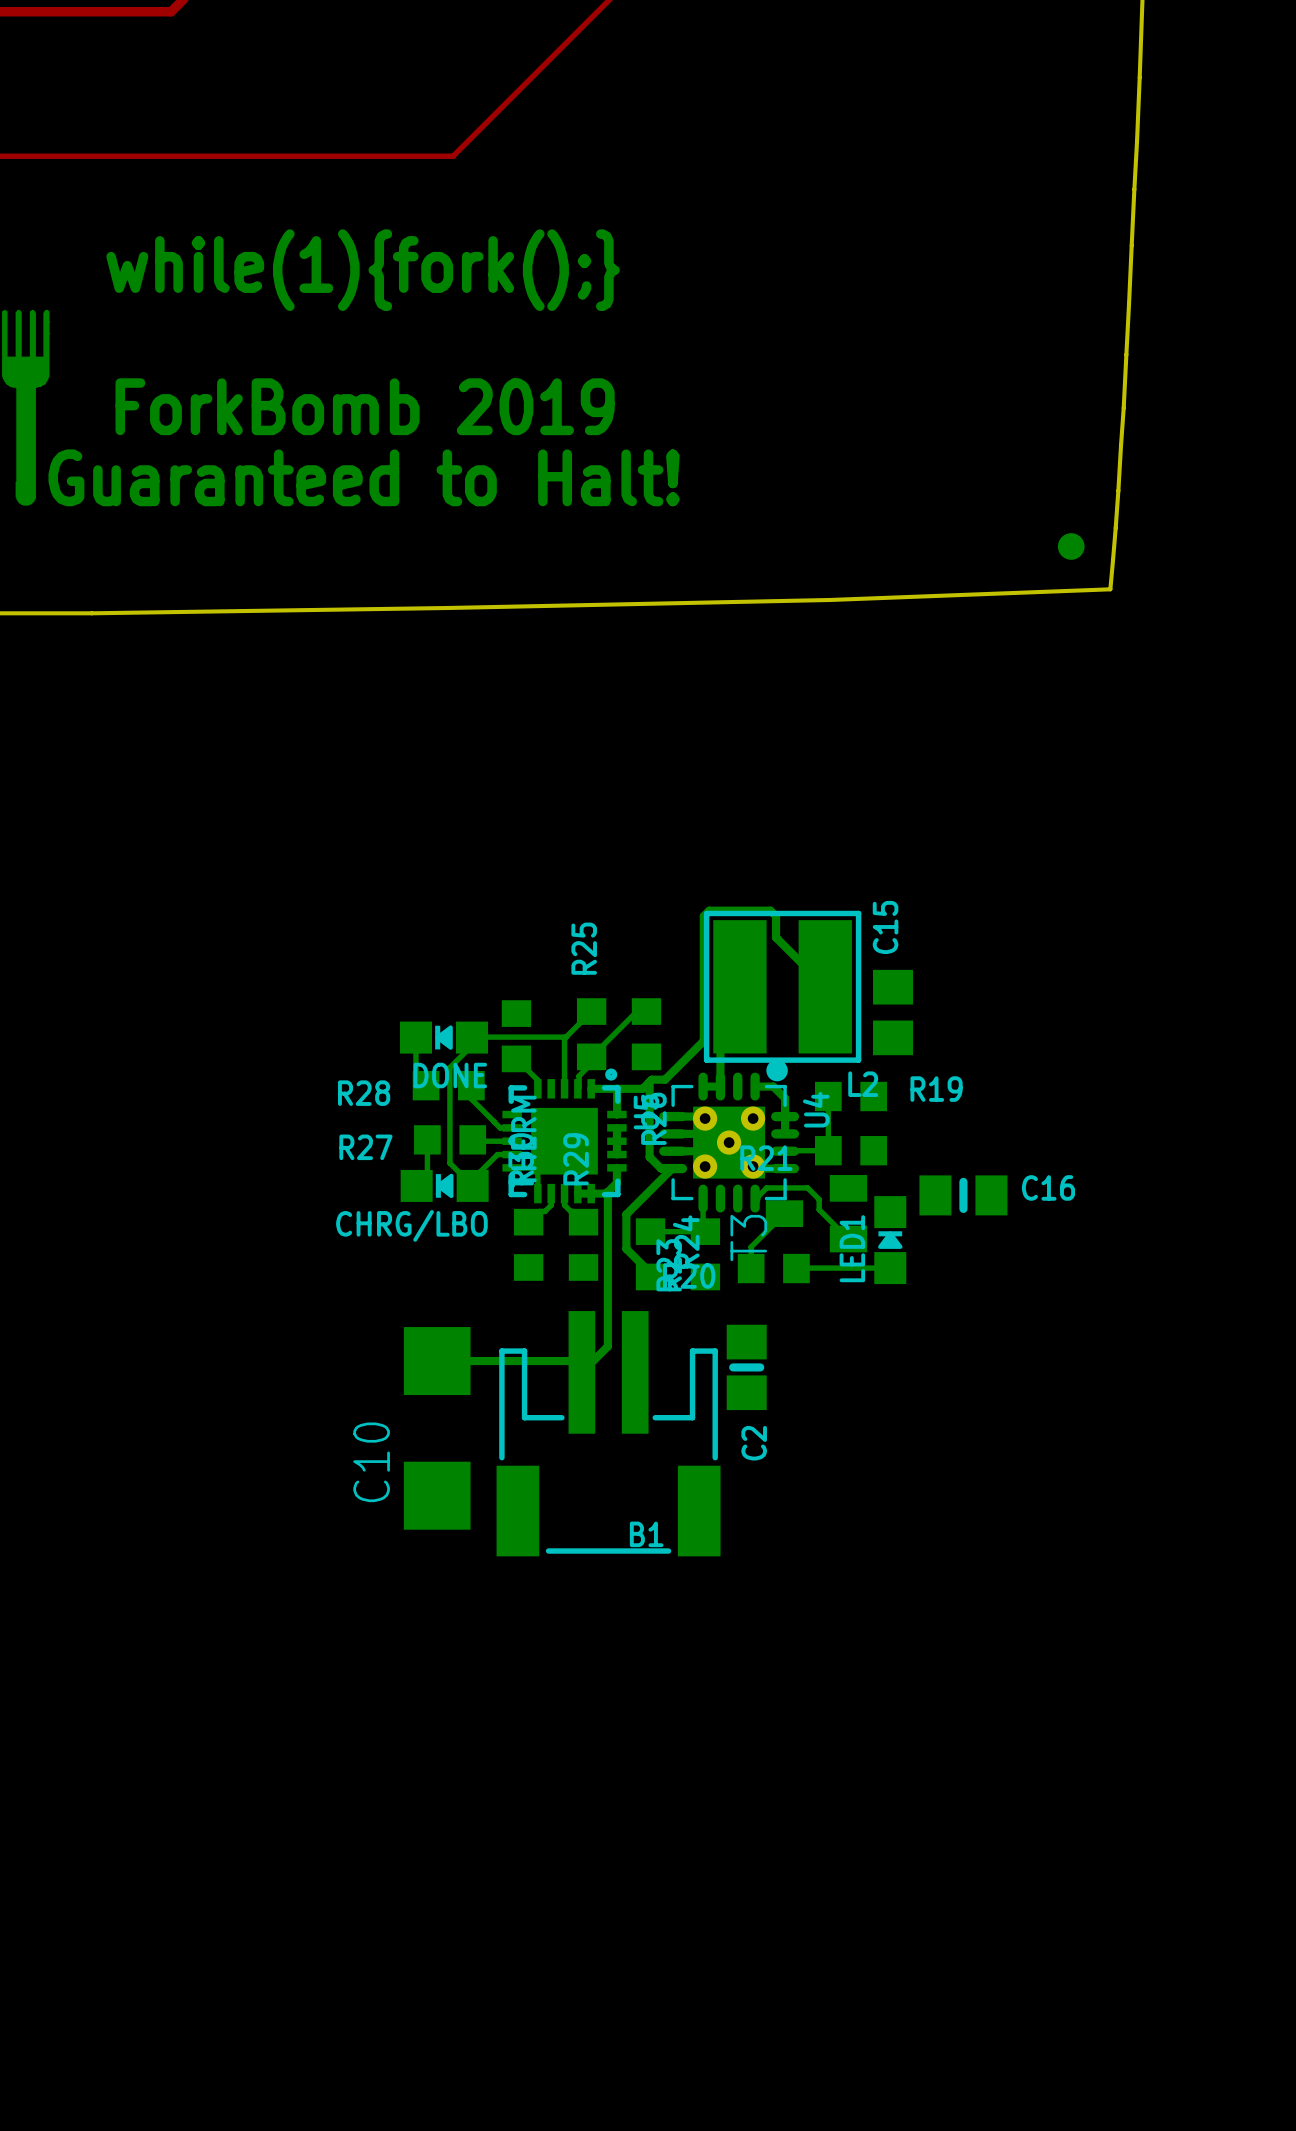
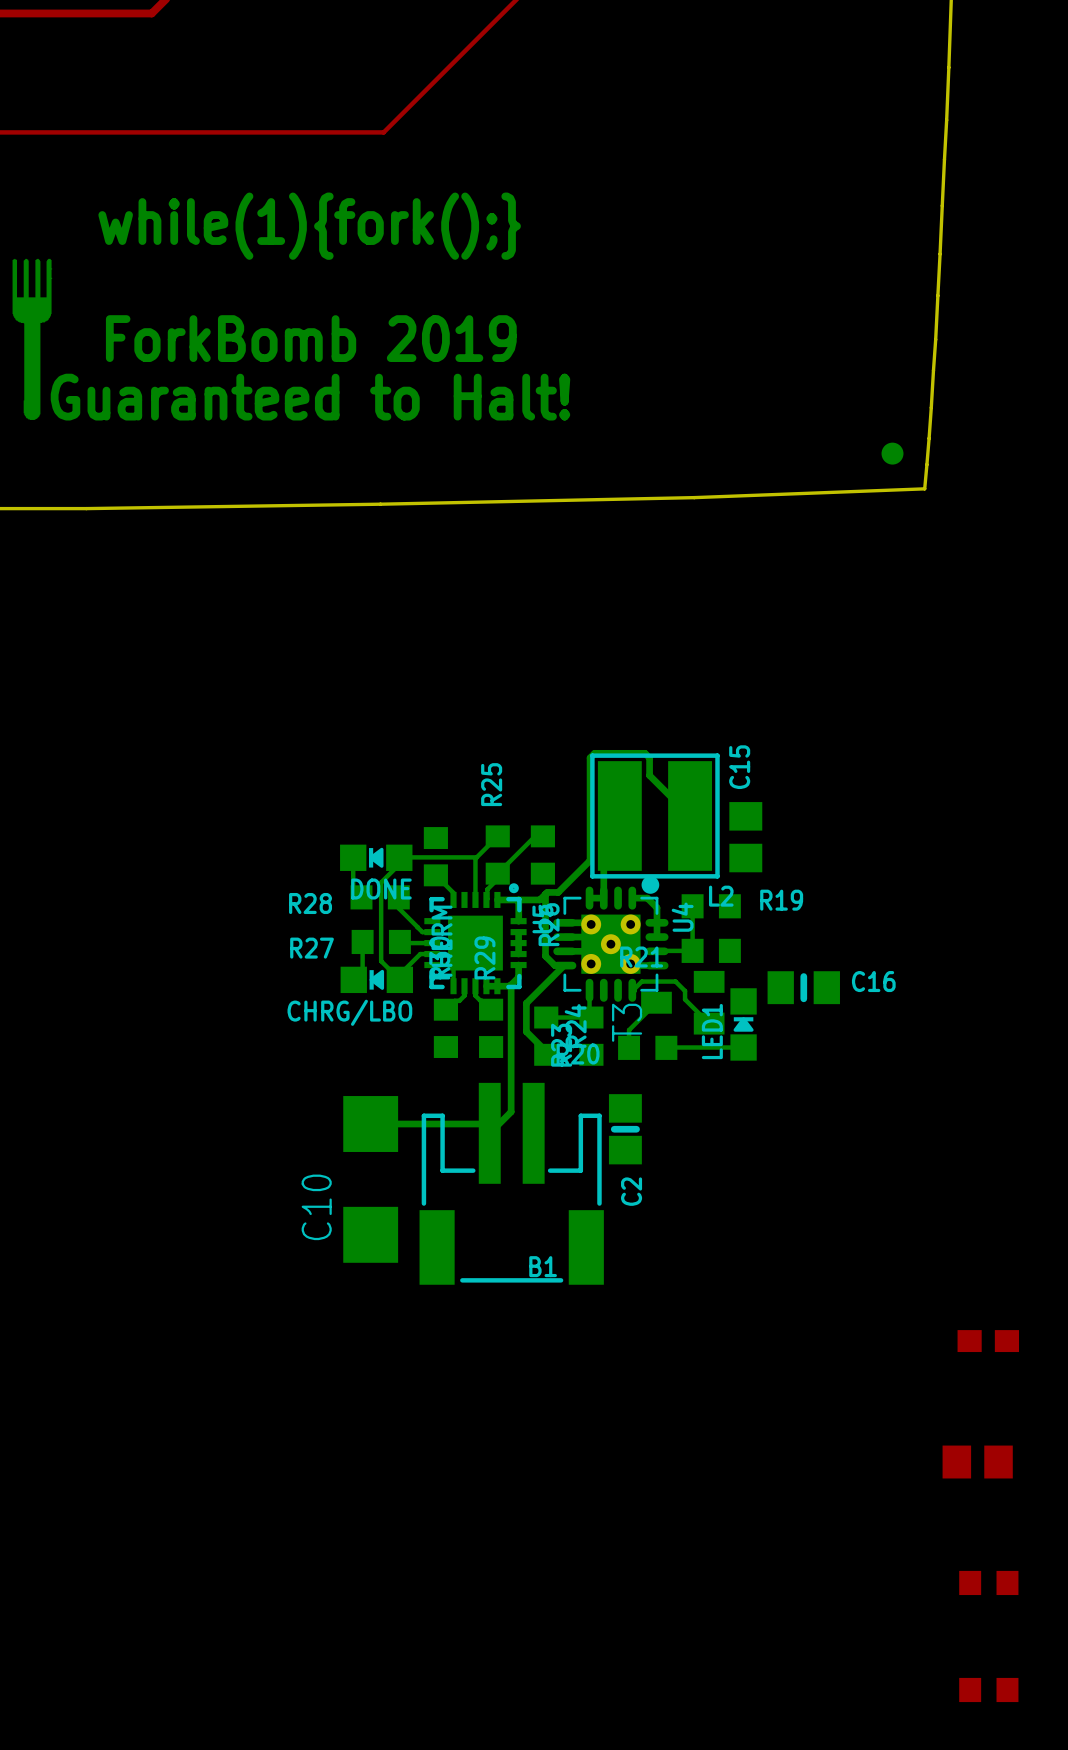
part: none -> (988, 1341)
part: none -> (977, 1462)
part: none -> (988, 1582)
part: none -> (988, 1689)

